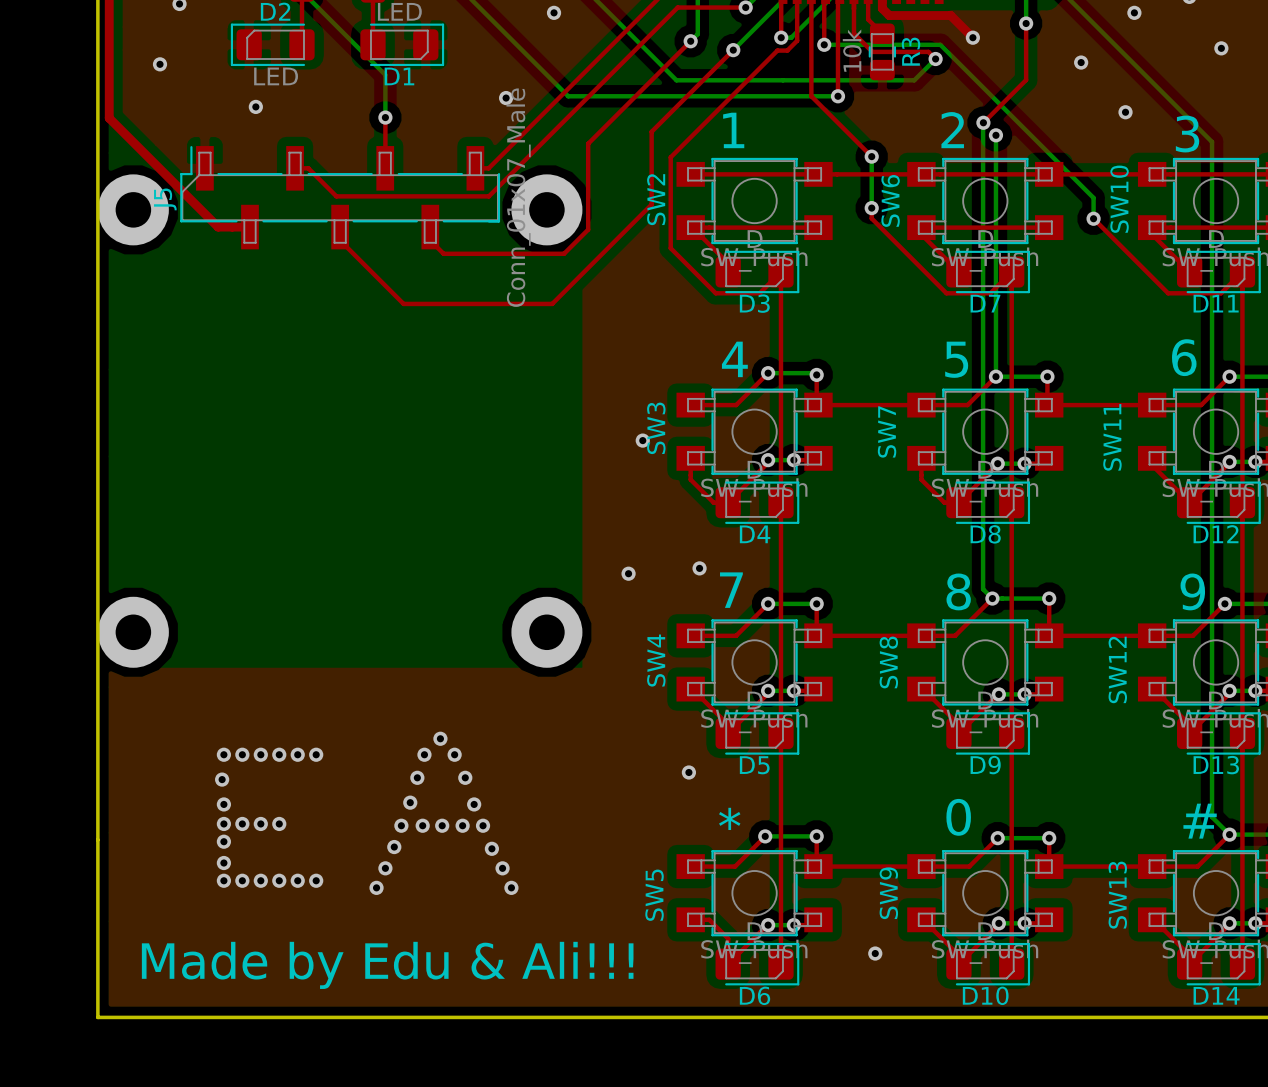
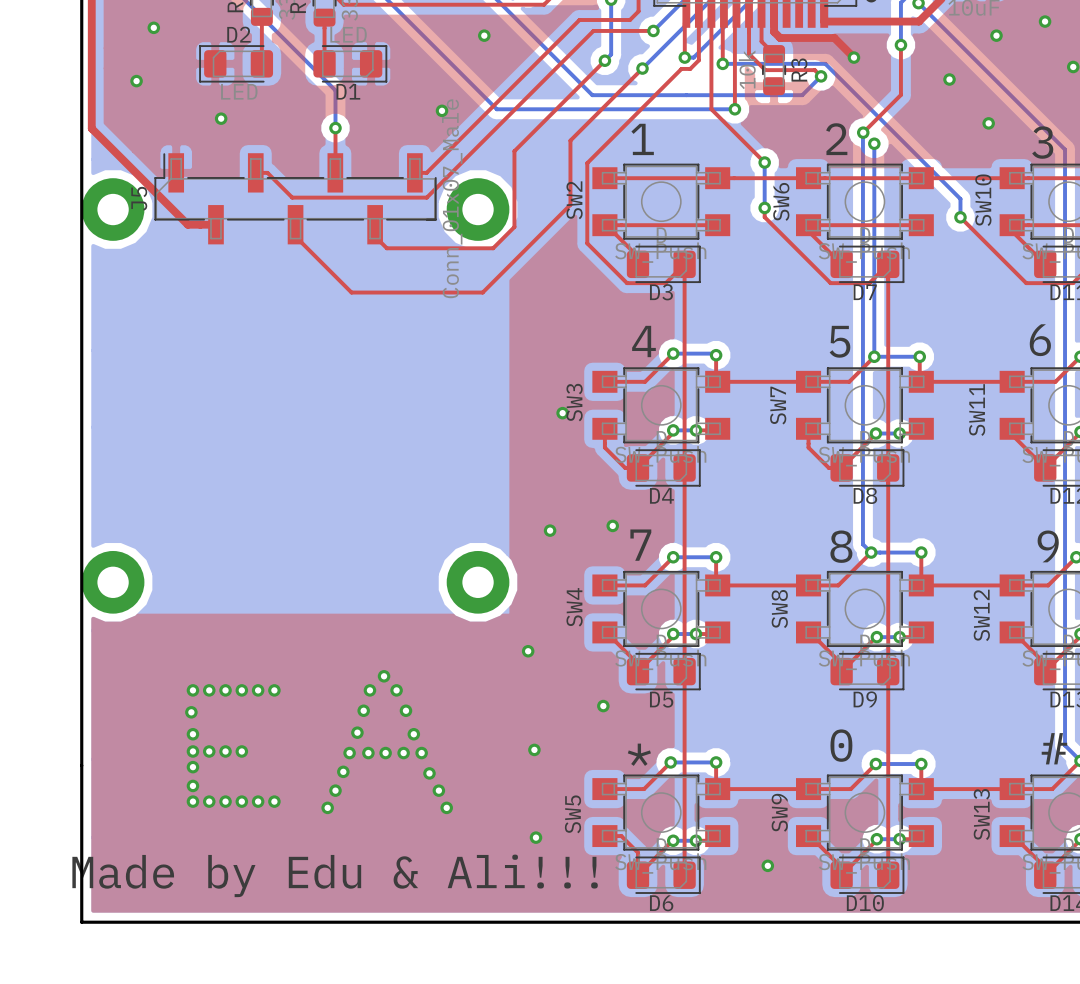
via: none -> (528, 651)
via: none -> (534, 749)
via: none -> (535, 837)

